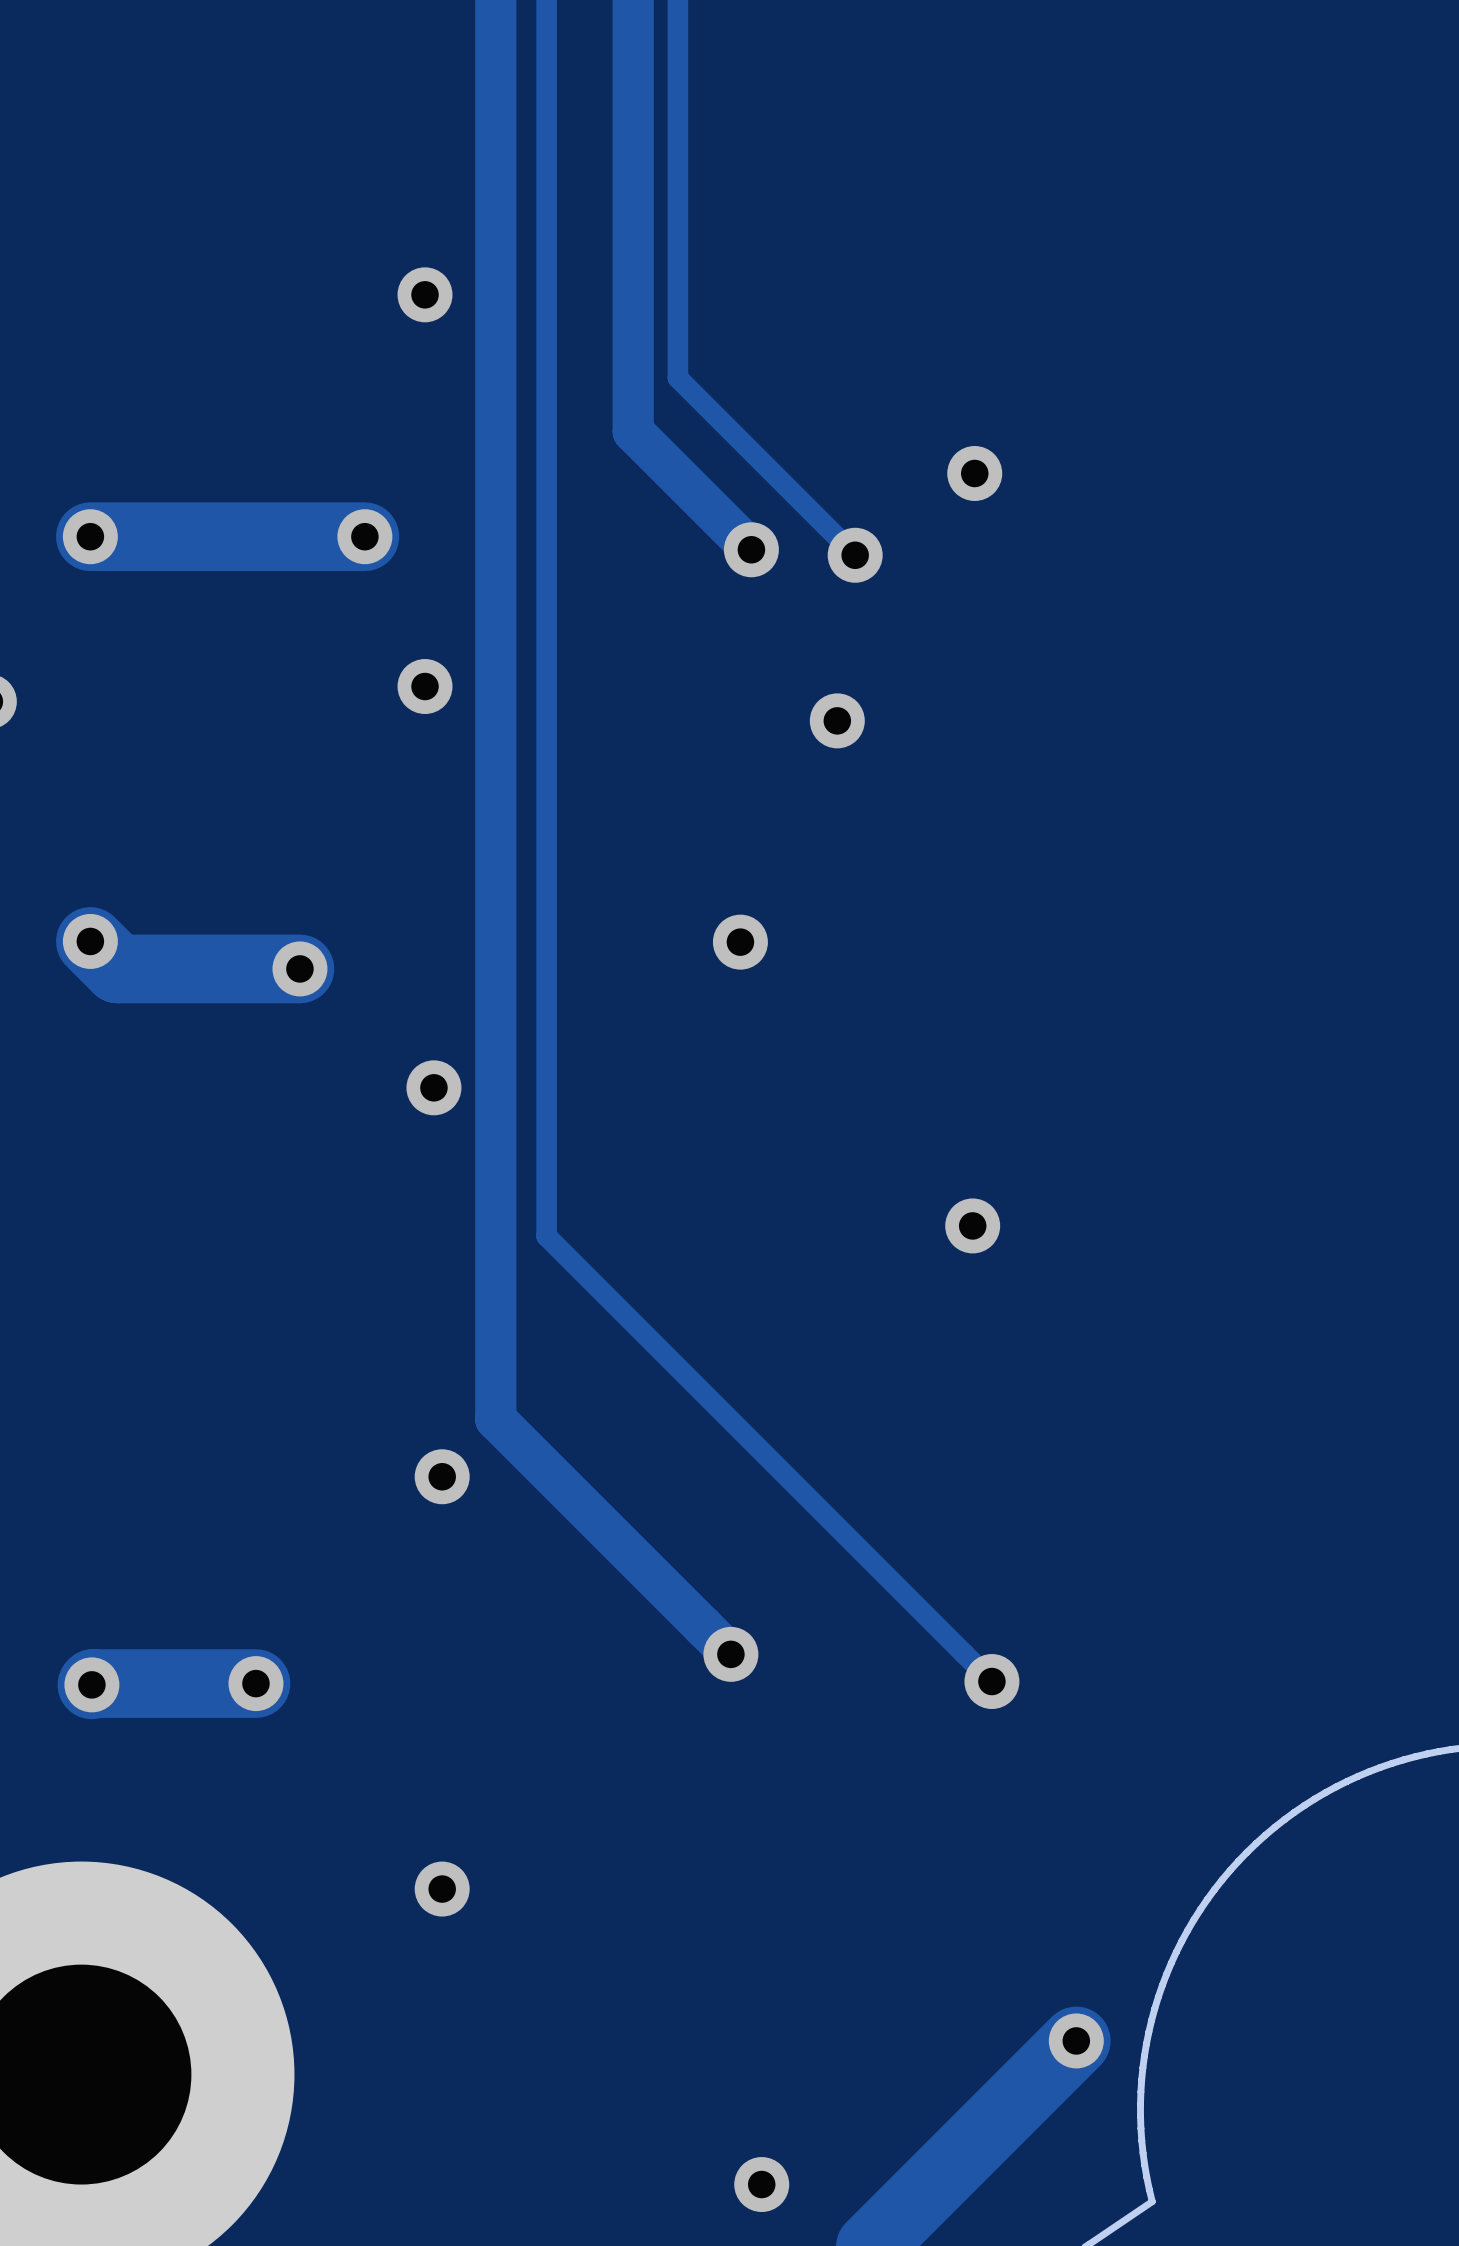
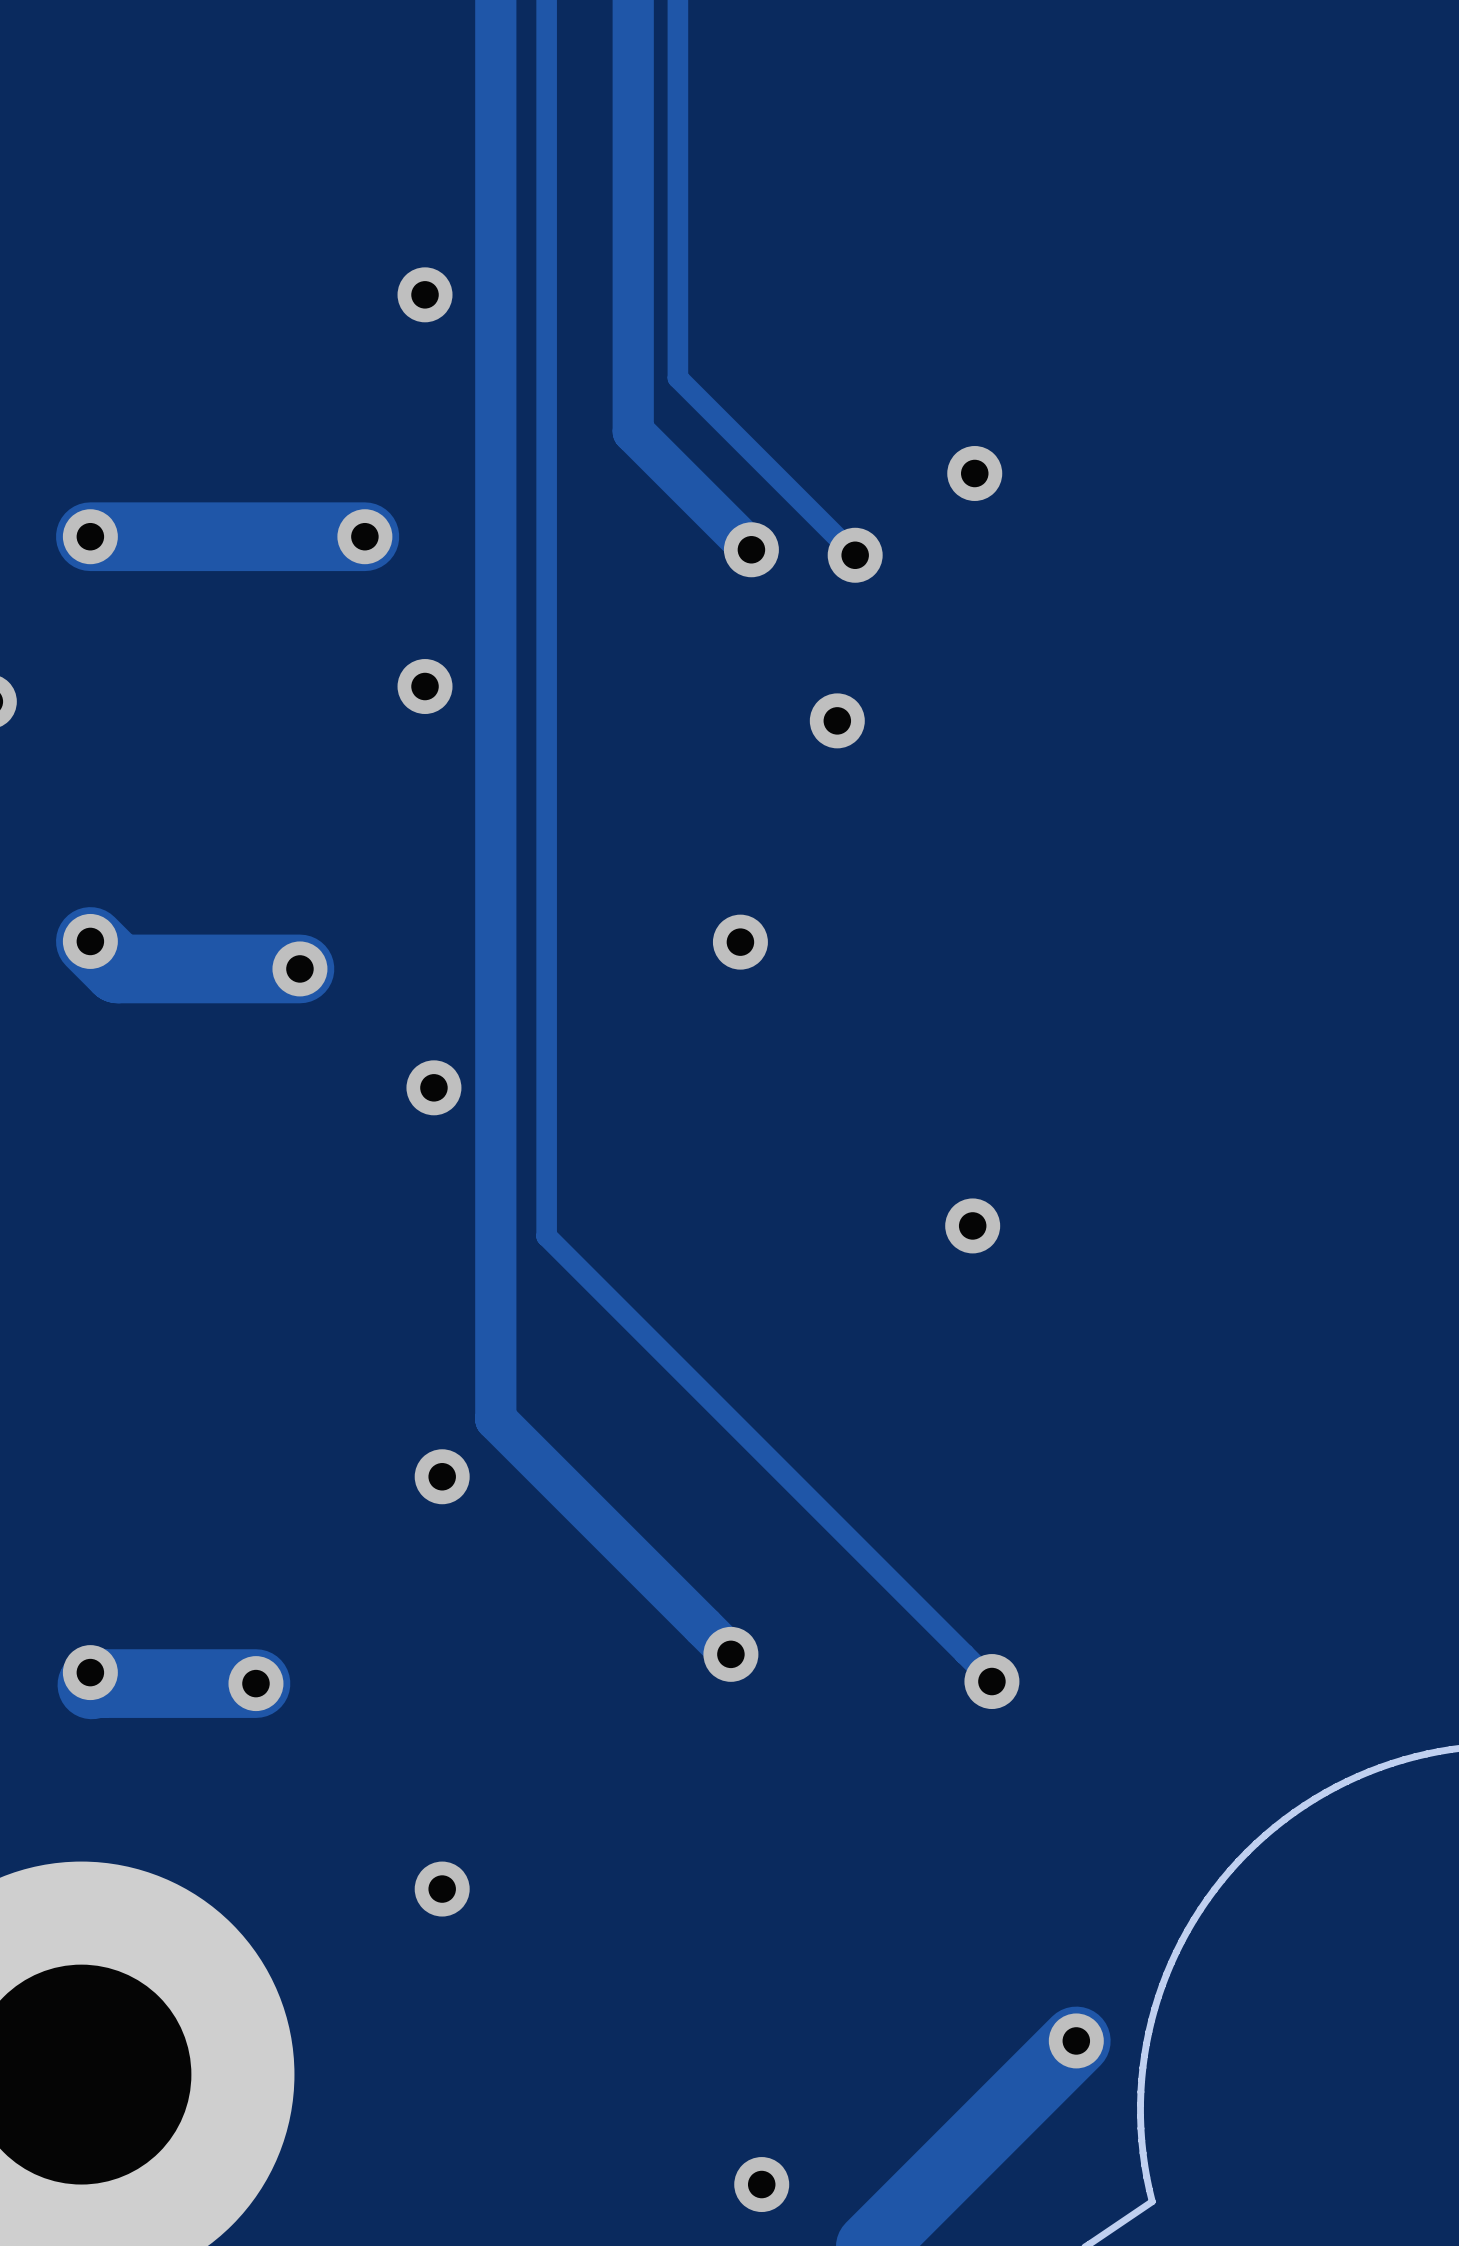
via position: (91, 1684) -> (90, 1672)

